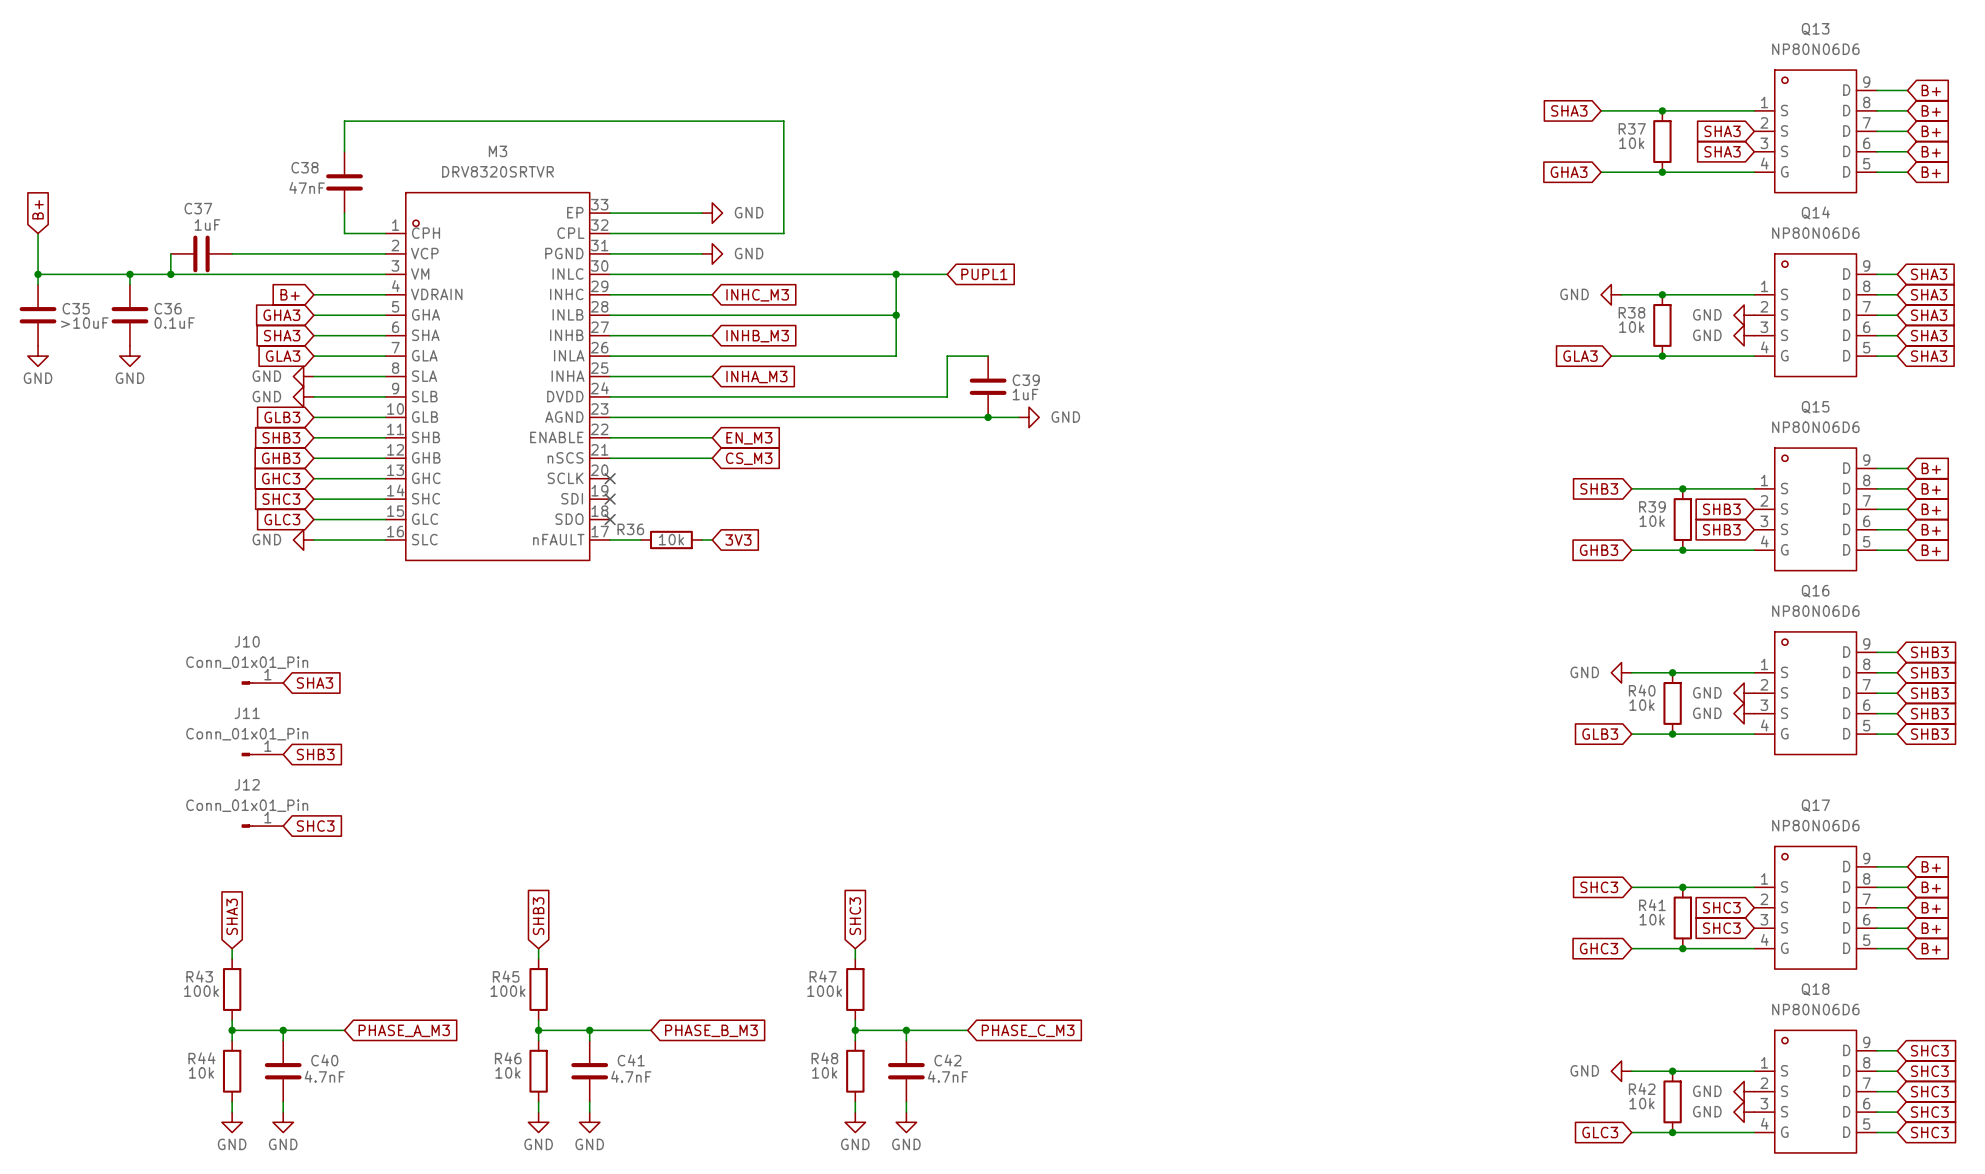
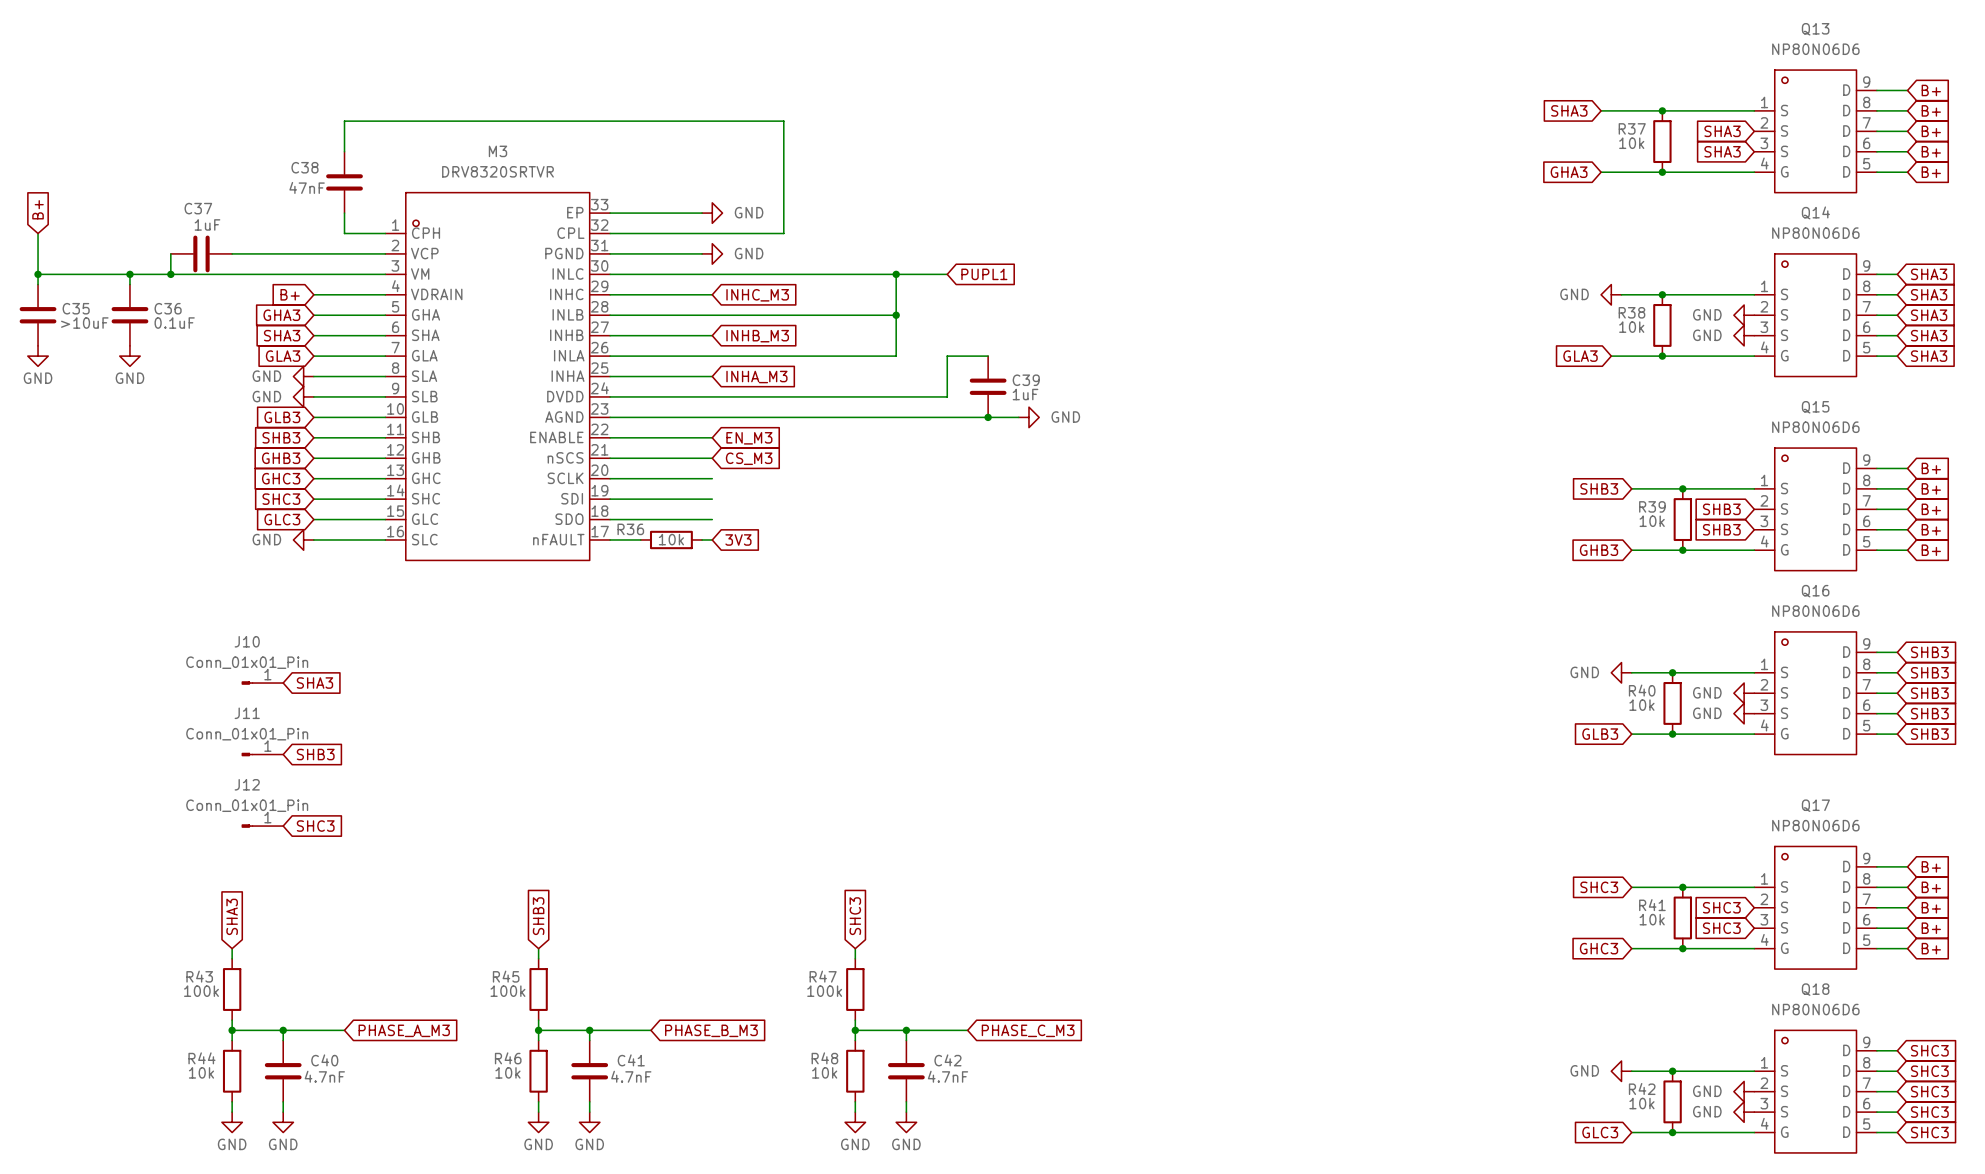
wire: none -> (610, 478) (712, 478)
no-connect mark: (610, 478) -> none
wire: none -> (610, 499) (712, 499)
no-connect mark: (610, 499) -> none
wire: none -> (610, 519) (712, 519)
no-connect mark: (610, 519) -> none

